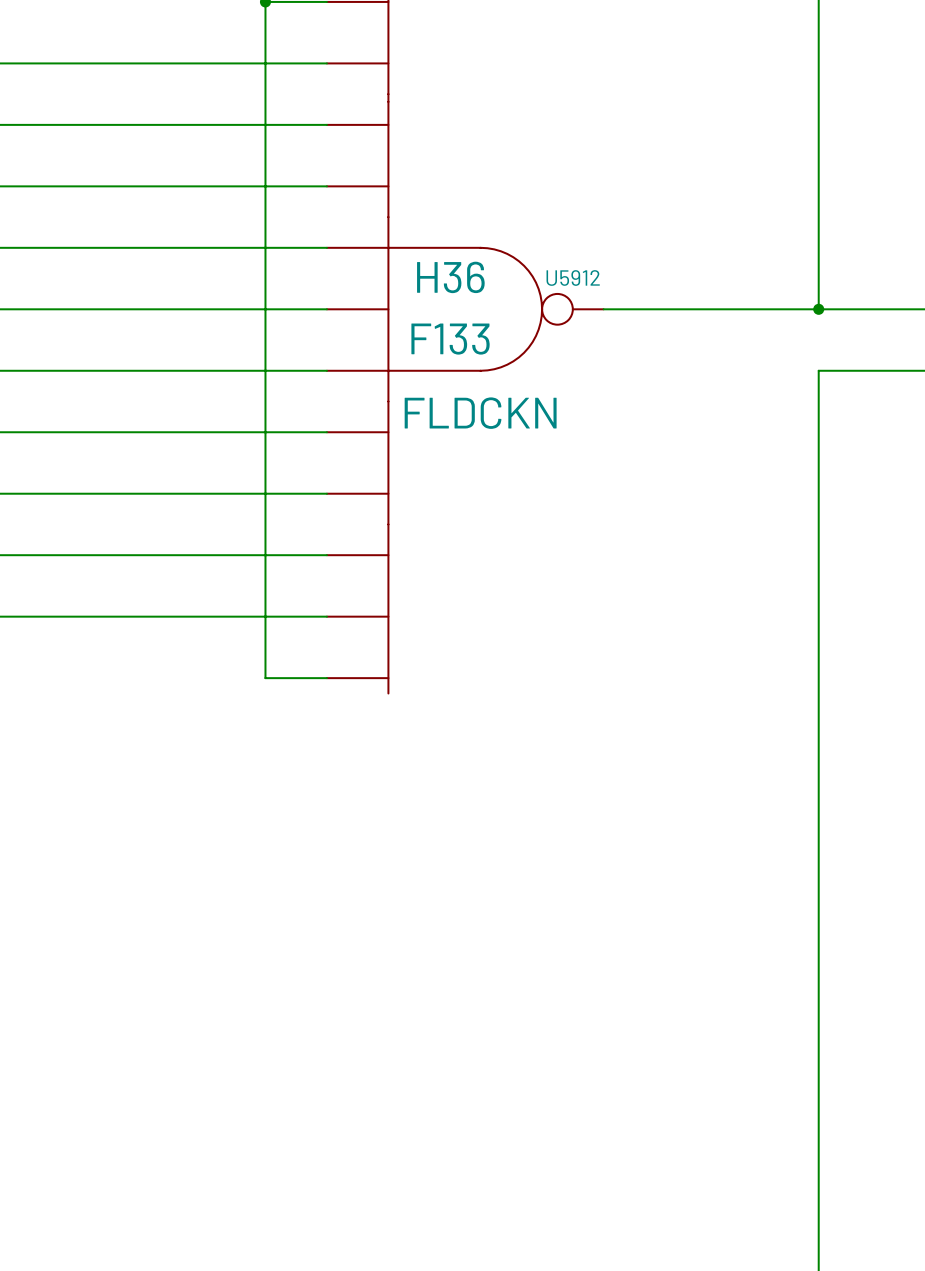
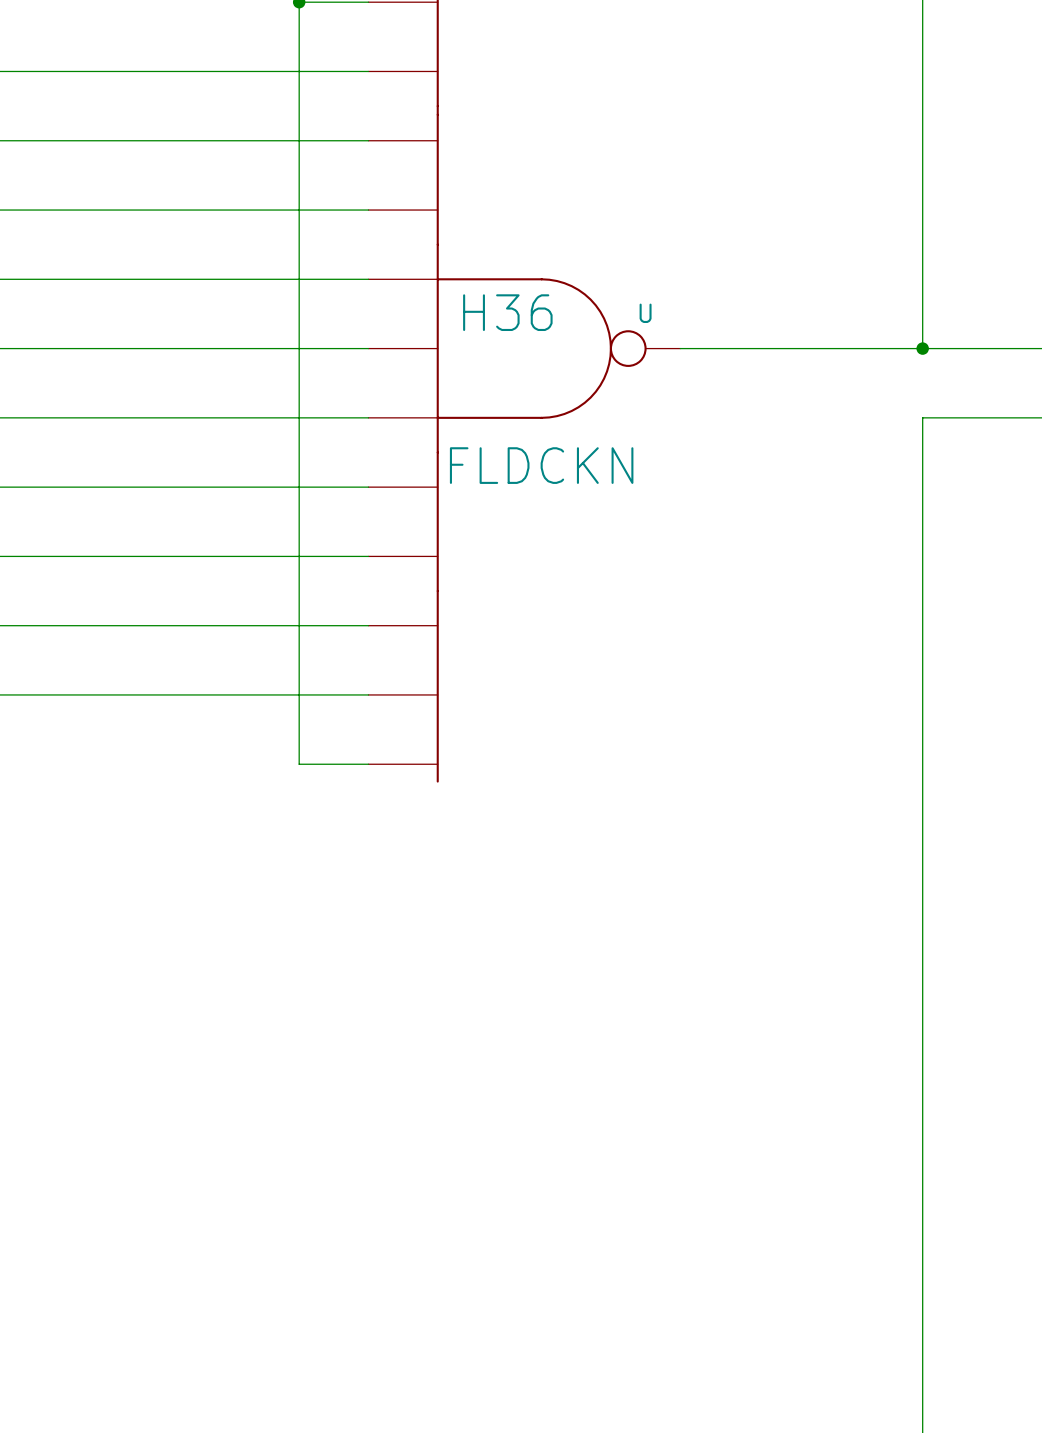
U5912 name: U5912 (573, 277) -> U (645, 313)
U5912 value: F133 (450, 339) -> none

